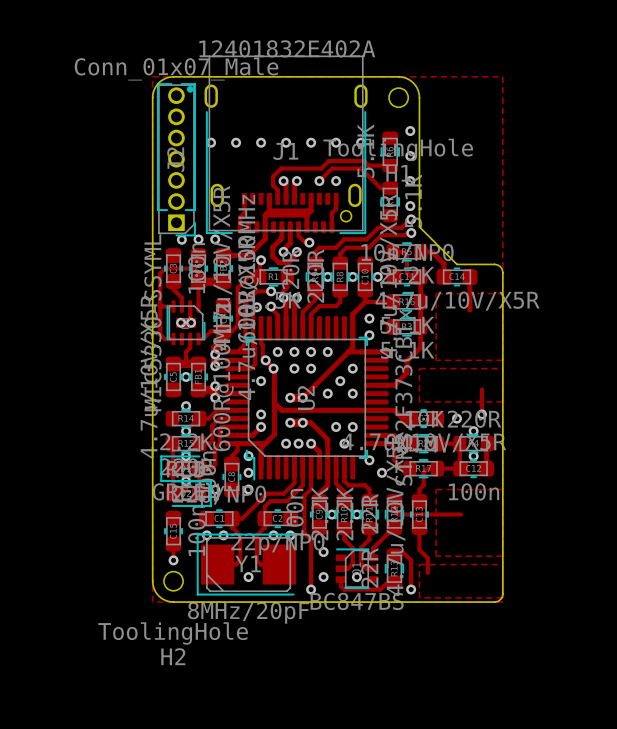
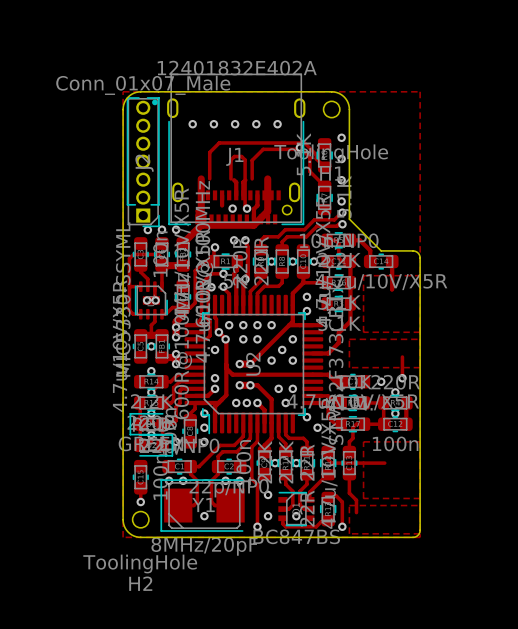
via: none -> (192, 124)
via: none -> (213, 124)
via: none -> (235, 124)
via: none -> (256, 124)
via: none -> (277, 124)
via: (211, 142) -> none
via: (236, 142) -> none
via: (261, 142) -> none
via: (286, 142) -> none
via: (311, 142) -> none
via: (336, 142) -> none
track: (390, 165) (368, 165) (364, 161) (328, 161) (321, 168) (281, 168) (273, 176) (273, 185) (277, 189) (277, 198) -> (324, 167) (316, 158) (316, 154) (304, 142) (219, 142) (209, 152) (209, 178)
track: none -> (201, 178) (201, 225)
track: none -> (230, 178) (230, 160) (234, 156) (241, 156) (245, 159) (245, 206) (247, 208)
track: none -> (267, 178) (267, 211) (253, 225) (201, 225)
via: (283, 181) -> none
via: (296, 181) -> none
track: (319, 181) (331, 168) (361, 168) (380, 188) (390, 188) -> (252, 178) (252, 160) (263, 149) (301, 149) (309, 157) (309, 171) (324, 186)
via: (319, 181) -> none
via: (336, 181) -> none
track: (336, 198) (336, 208) (331, 213) (331, 227) -> none
track: (311, 210) (269, 210) (265, 215) -> none
via: none -> (232, 208)
via: none -> (247, 208)
track: (265, 215) (265, 238) (248, 255) (231, 255) -> none
track: (265, 215) (306, 215) -> none
track: (281, 227) (281, 238) (272, 247) (272, 256) (279, 262) (288, 262) (296, 251) -> none
track: (290, 227) (290, 243) (283, 251) -> none
track: (298, 227) (298, 235) (305, 242) -> none
track: none -> (201, 225) (183, 243)
via: (309, 242) -> none
track: none -> (247, 244) (247, 276) (245, 279)
via: (283, 297) -> none

